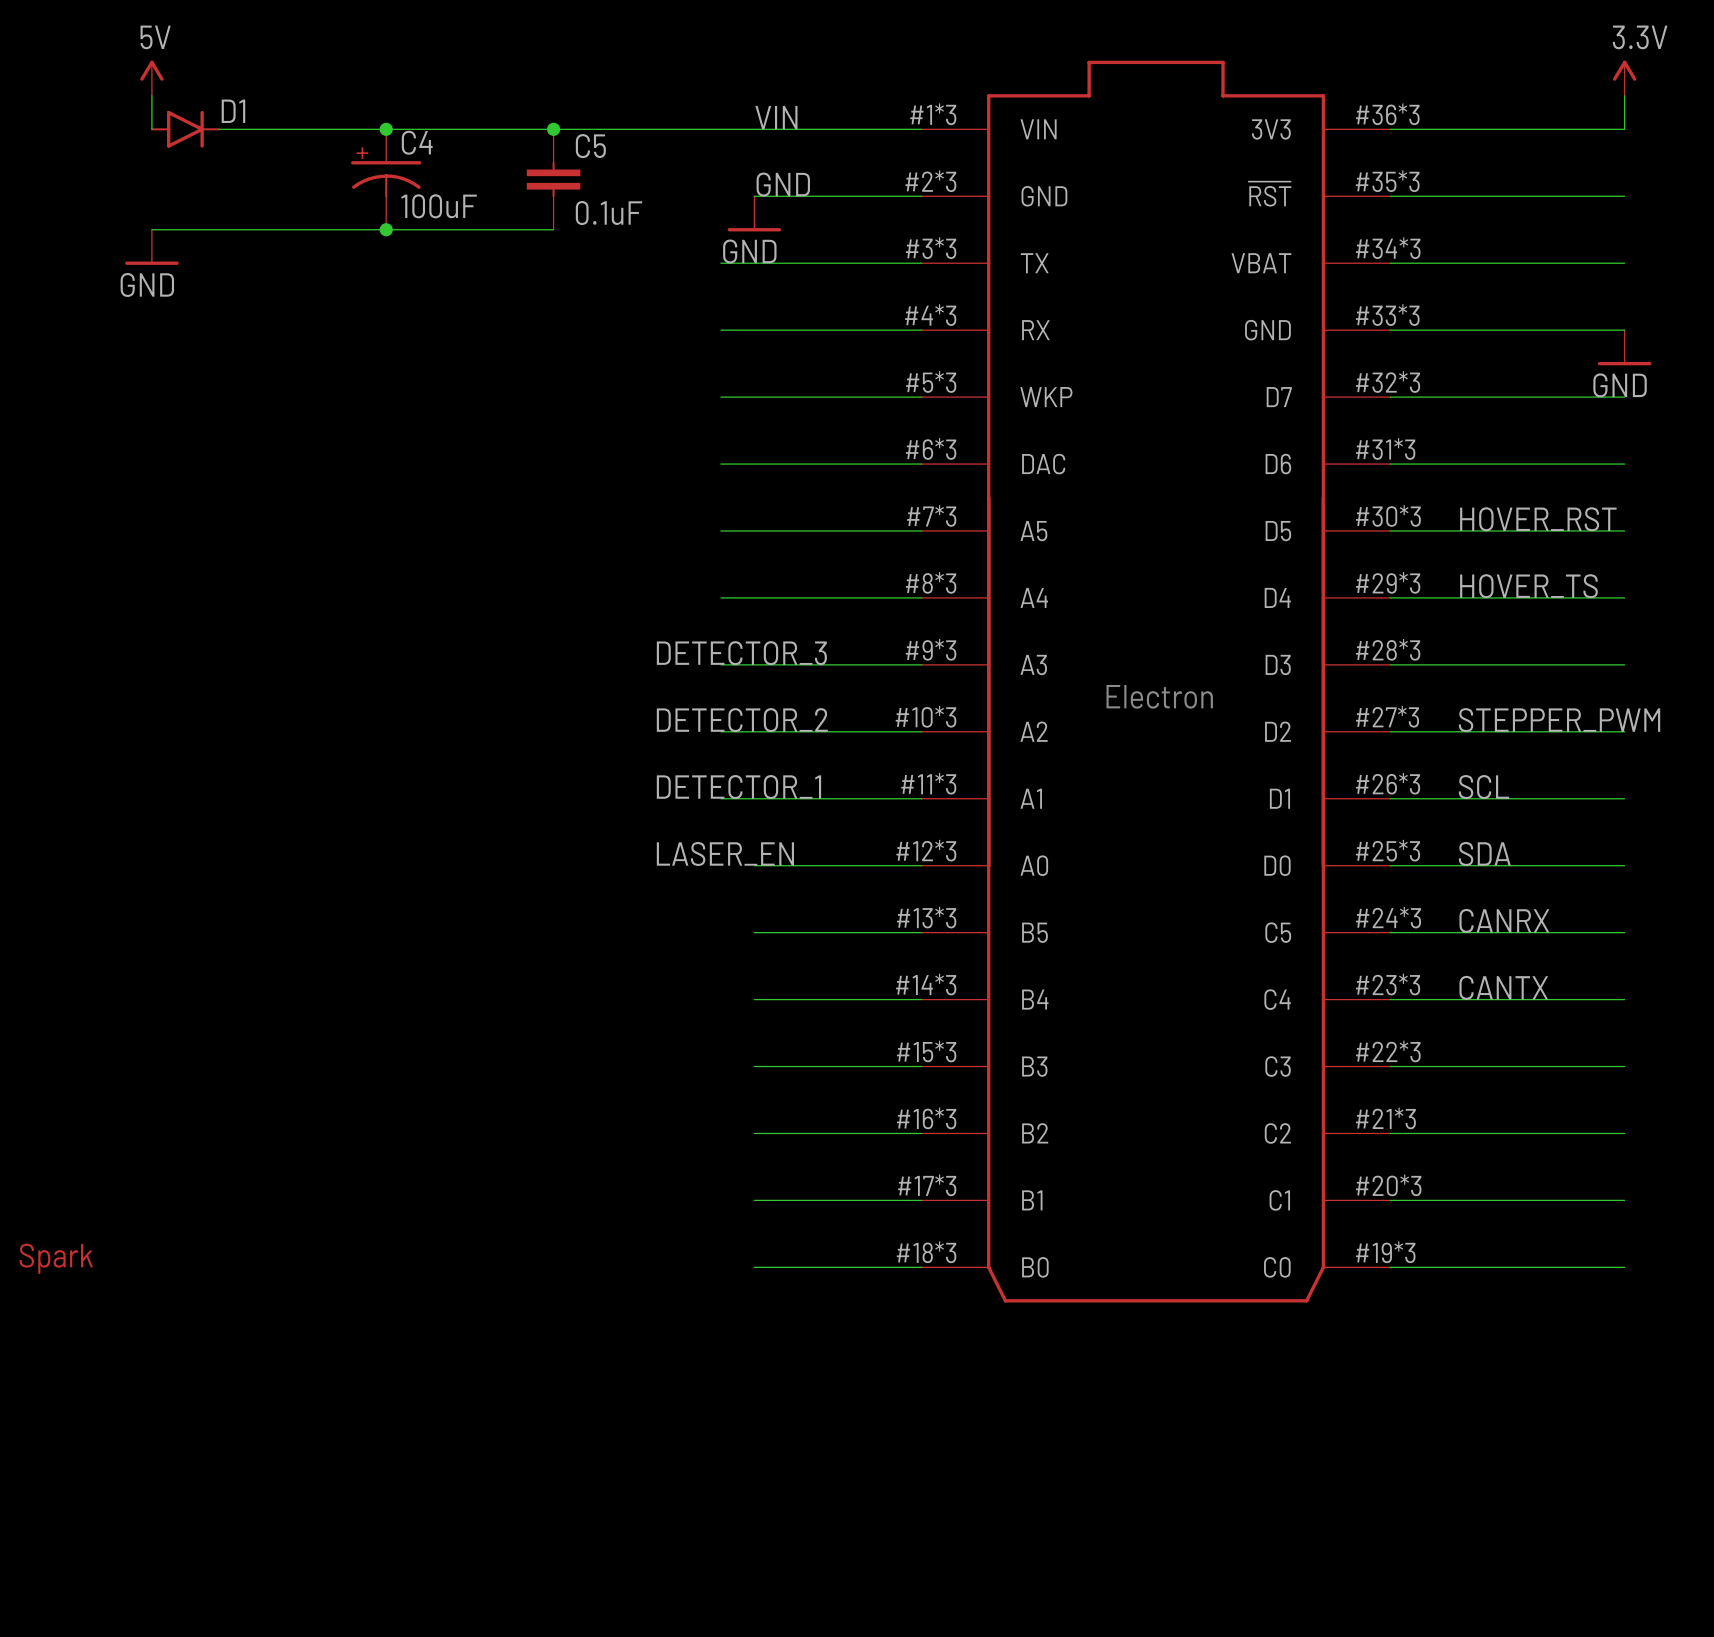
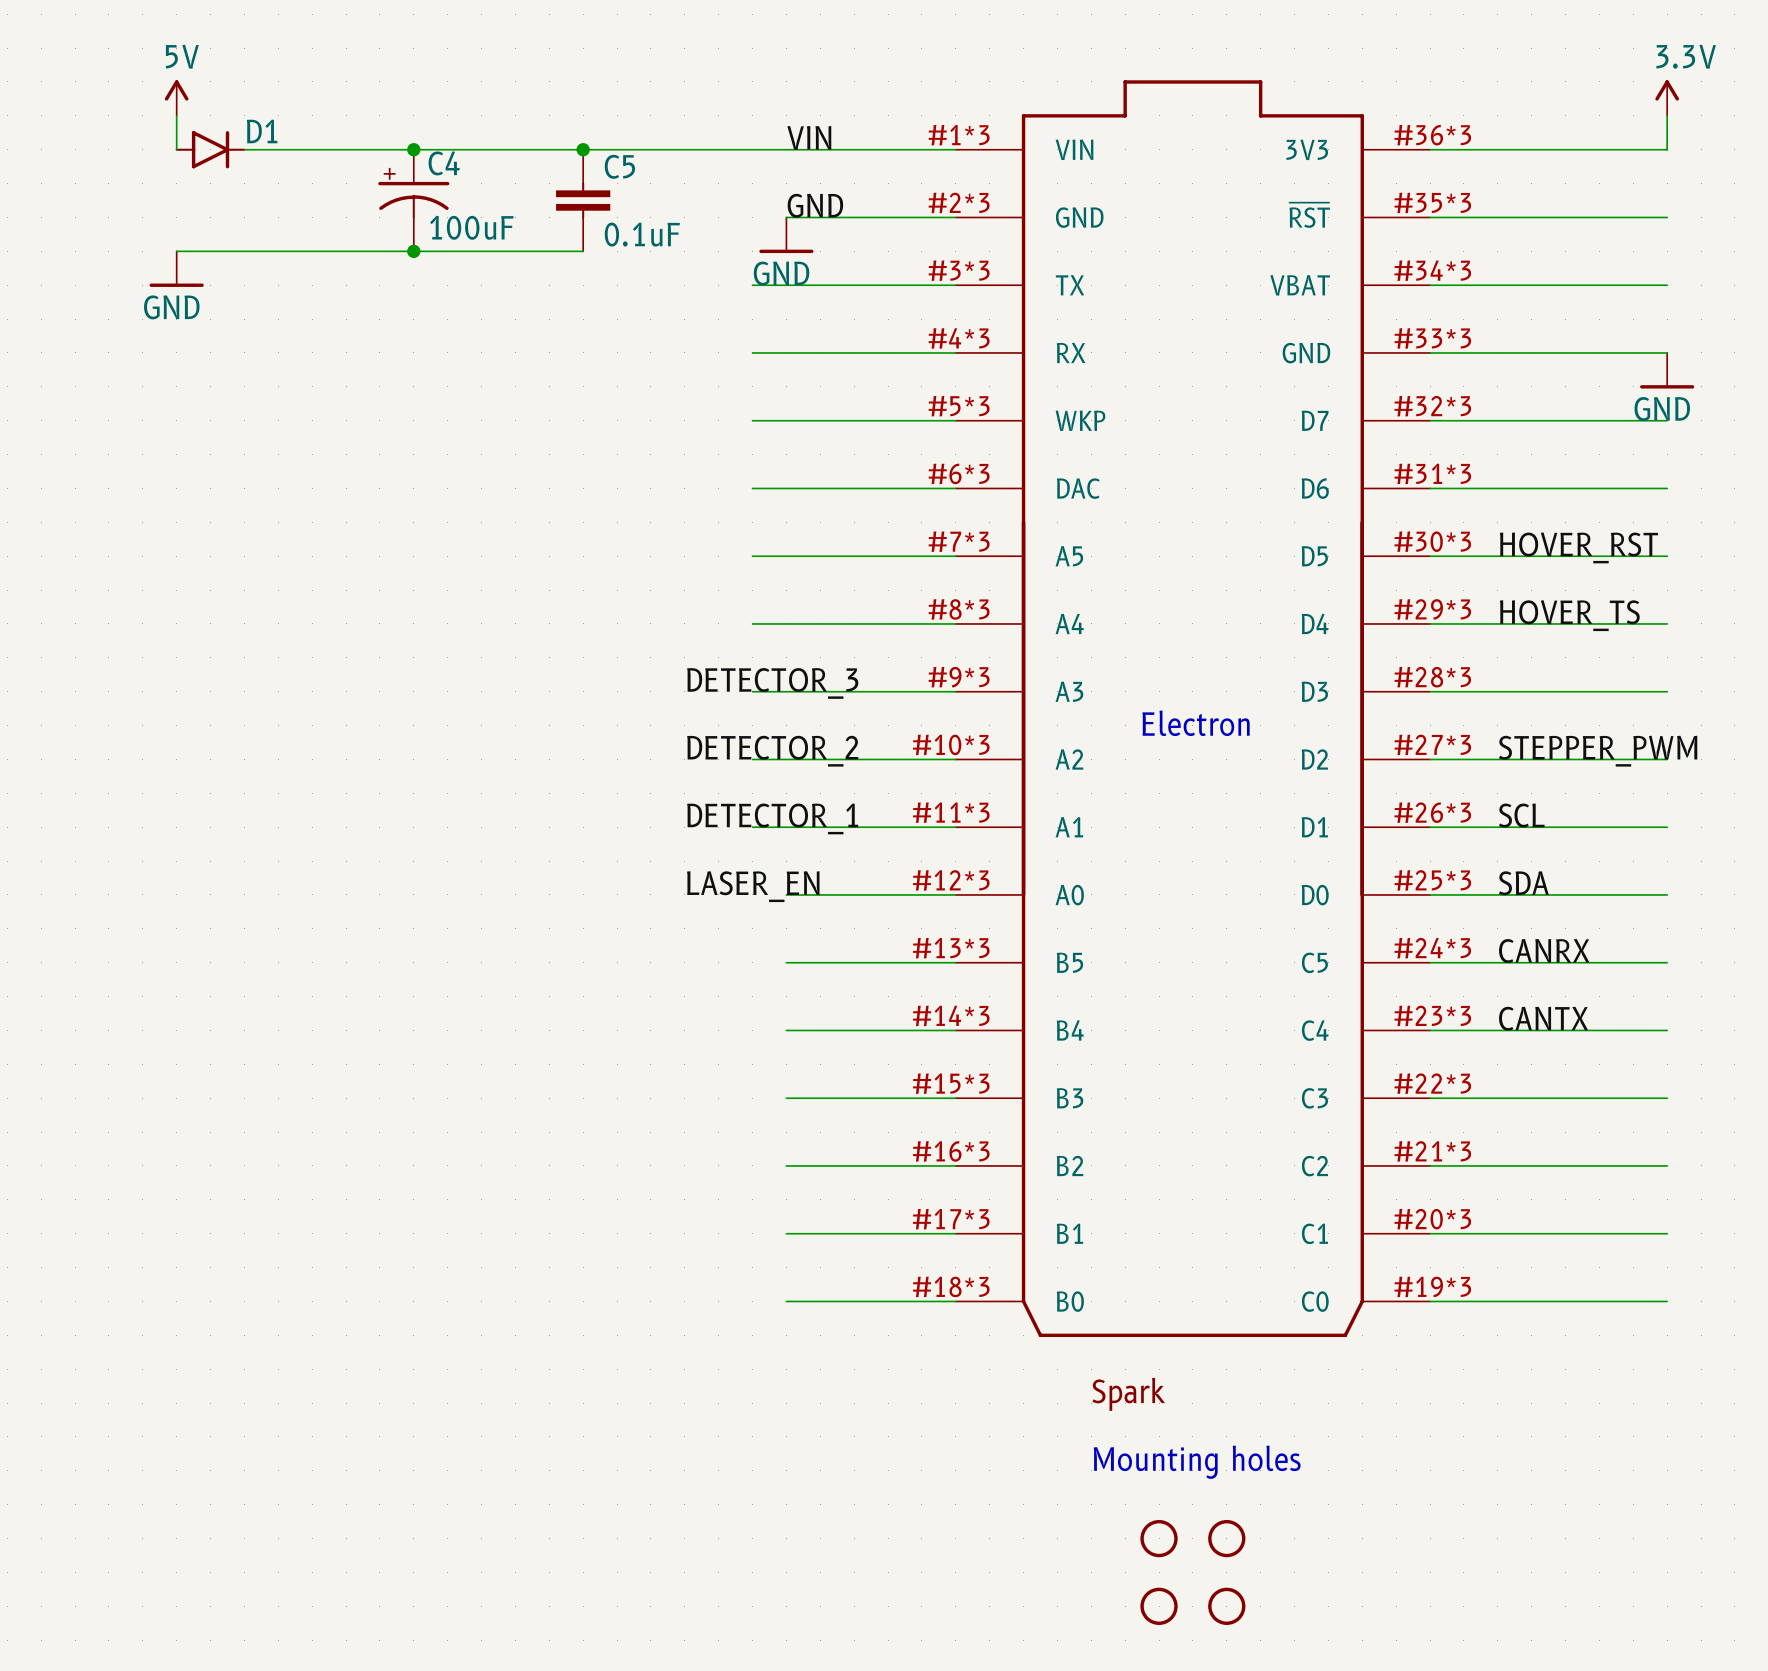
part: (56, 1258) -> none
part: none -> (1128, 1394)
text: none -> Mounting holes (1197, 1462)
part: none -> (1159, 1538)
part: none -> (1226, 1538)
part: none -> (1159, 1606)
part: none -> (1226, 1606)

